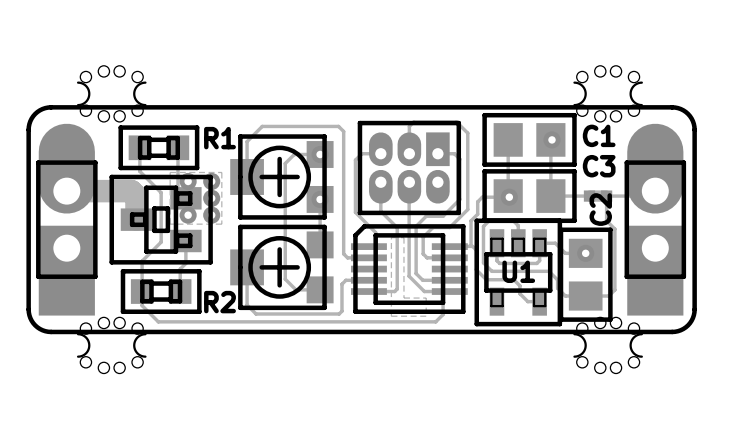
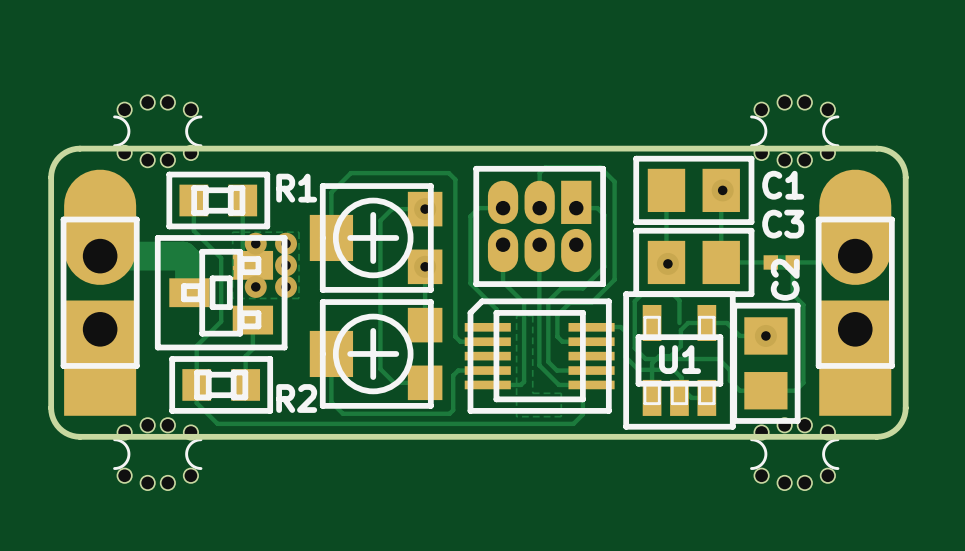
track: (509, 197) (482, 197) (477, 201) (477, 214) (471, 220) (471, 246) -> none
track: (496, 243) (496, 260) (499, 263) (536, 263) (539, 260) (539, 243) -> (652, 397) (652, 363) (659, 356) (670, 356) (680, 346) (680, 330) (688, 322) (706, 322)
U1 rotation: 0° (518, 272) -> 180° (679, 360)

